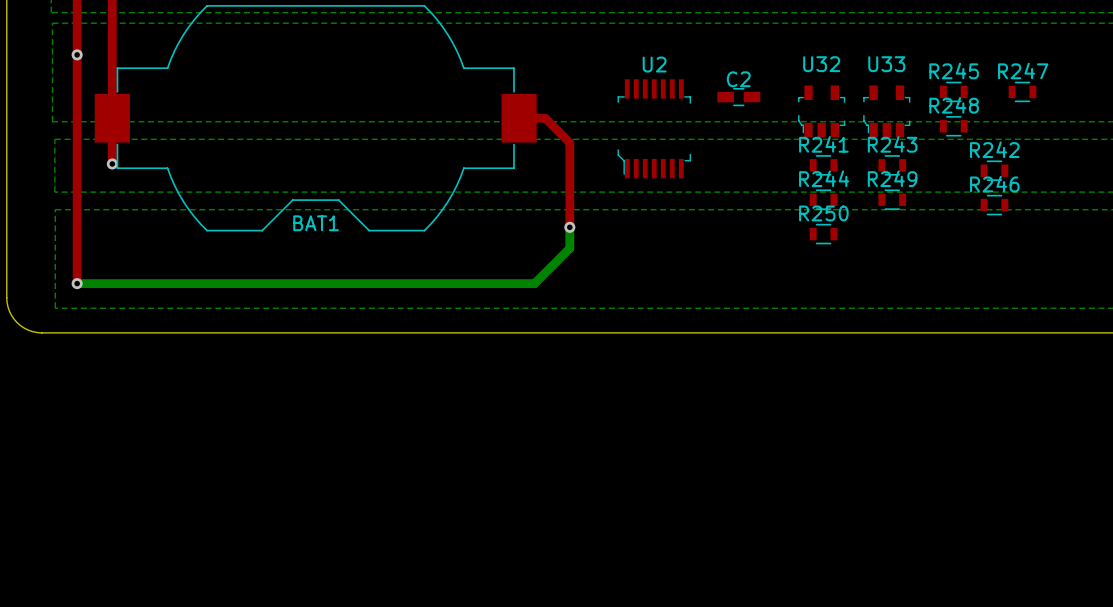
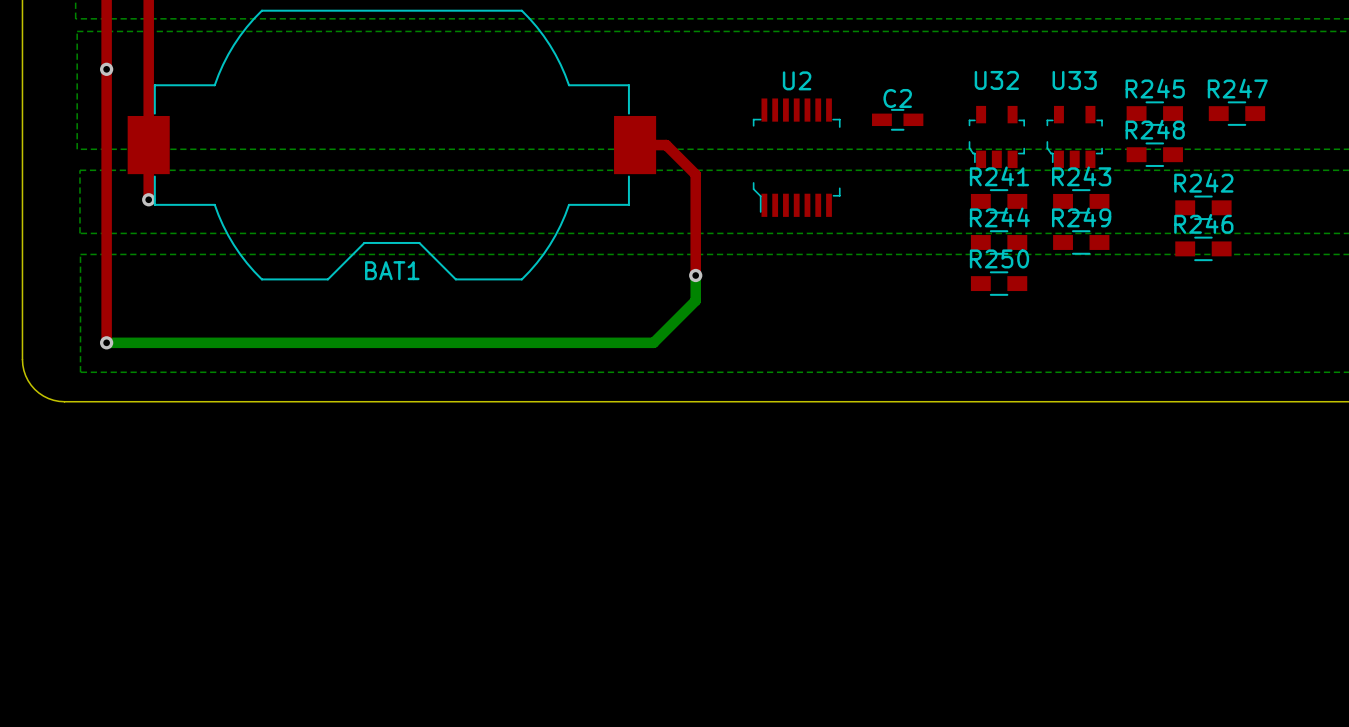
R245 footprint: [939, 81, 968, 103] -> [1126, 101, 1183, 126]
R247 footprint: [1008, 81, 1037, 103] -> [1208, 101, 1266, 126]
R248 footprint: [939, 116, 968, 137] -> [1126, 142, 1183, 167]
R241 footprint: [809, 155, 838, 176] -> [970, 189, 1028, 214]
R243 footprint: [878, 155, 907, 176] -> [1053, 189, 1110, 214]
R242 footprint: [980, 160, 1009, 181] -> [1175, 195, 1232, 221]
R244 footprint: [809, 189, 838, 210] -> [970, 230, 1028, 255]
R249 footprint: [878, 189, 907, 210] -> [1053, 230, 1110, 255]
R246 footprint: [980, 194, 1009, 216] -> [1175, 236, 1232, 262]
R250 footprint: [809, 223, 838, 245] -> [970, 271, 1028, 296]

